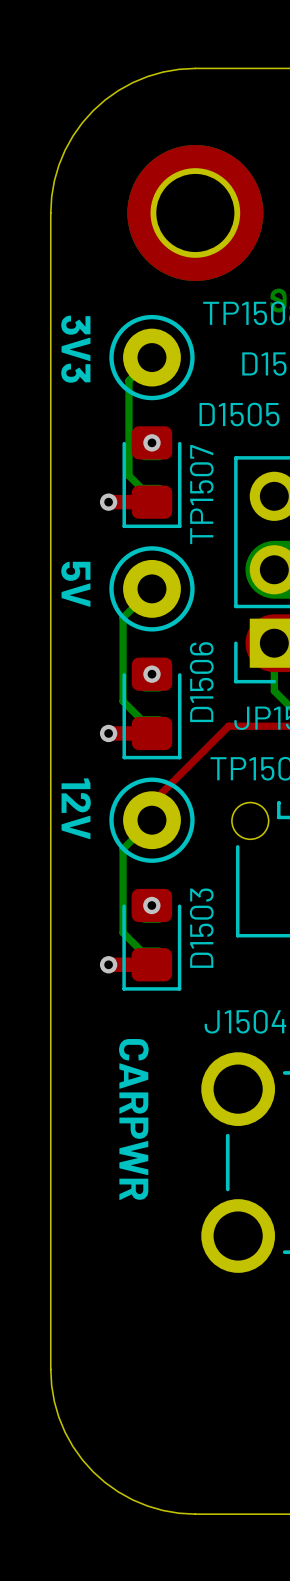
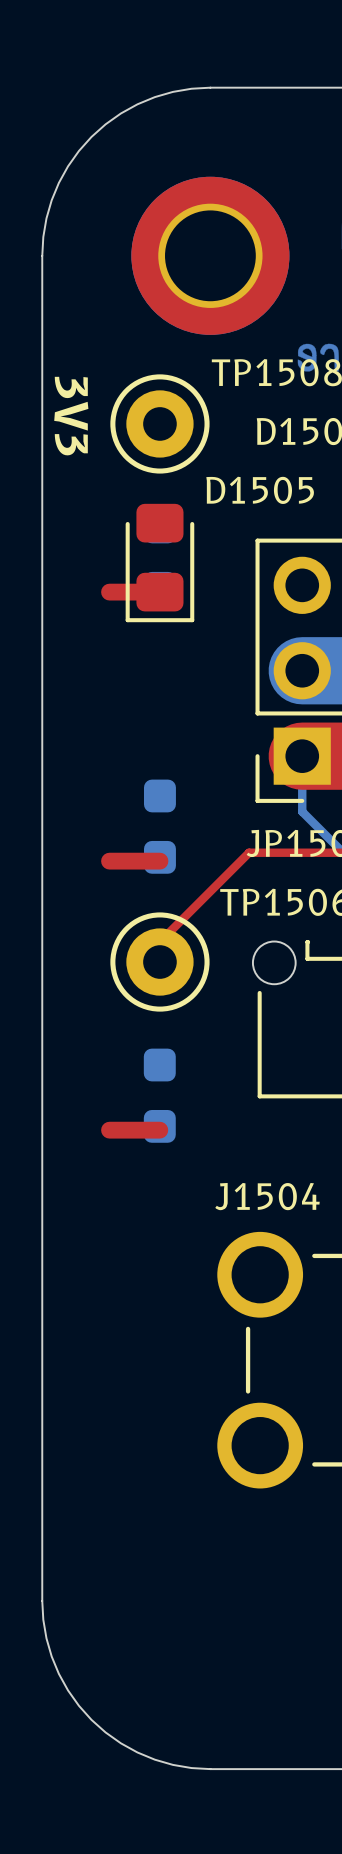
bottom track: (151, 357) (128, 380) (128, 475) (152, 498) -> none
via: (151, 442) -> none
via: (108, 502) -> none
text: 5V (75, 584) -> none
bottom track: (151, 588) (123, 617) (123, 701) (151, 730) -> none
TP1507: (151, 588) -> none
via: (151, 674) -> none
D1506: (151, 708) -> none
via: (108, 733) -> none
text: 12V (76, 808) -> none
bottom track: (151, 820) (123, 849) (123, 932) (151, 961) -> none
via: (151, 905) -> none
D1503: (151, 939) -> none
via: (108, 964) -> none
text: CARPWR (133, 1119) -> none

